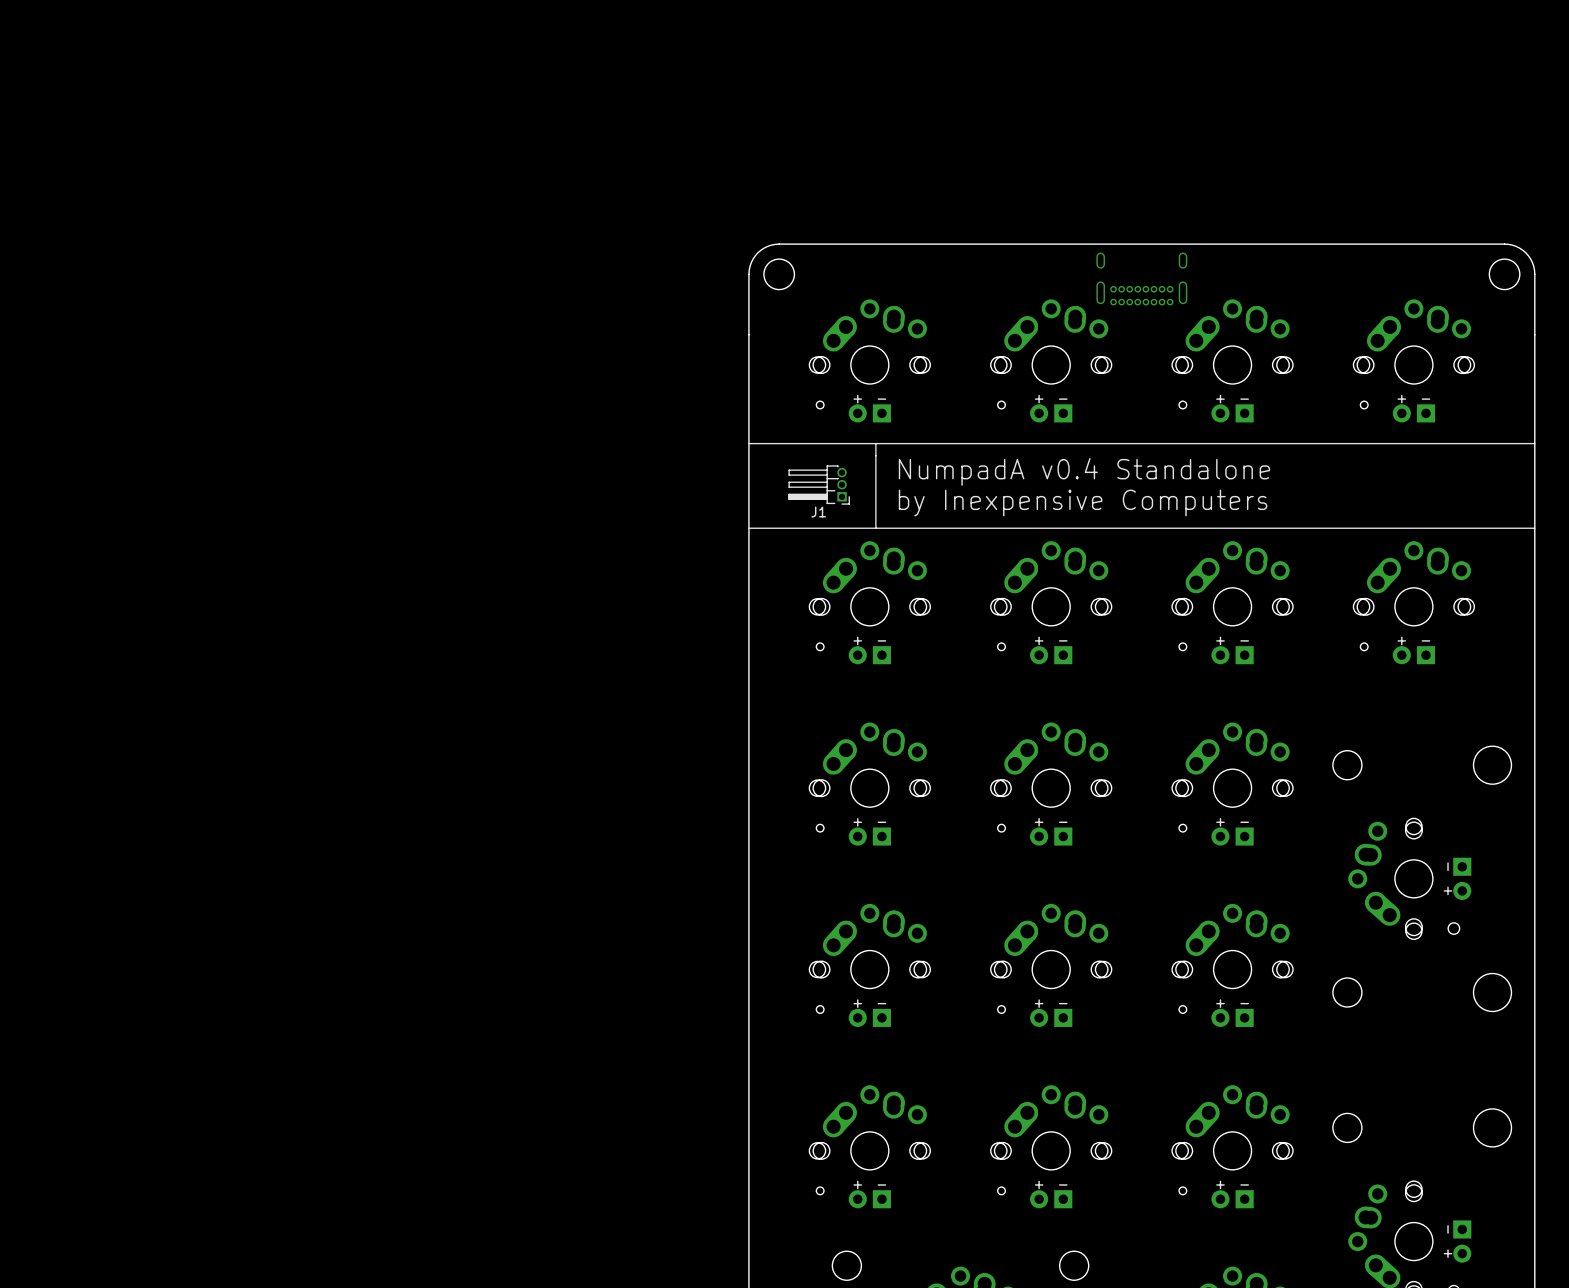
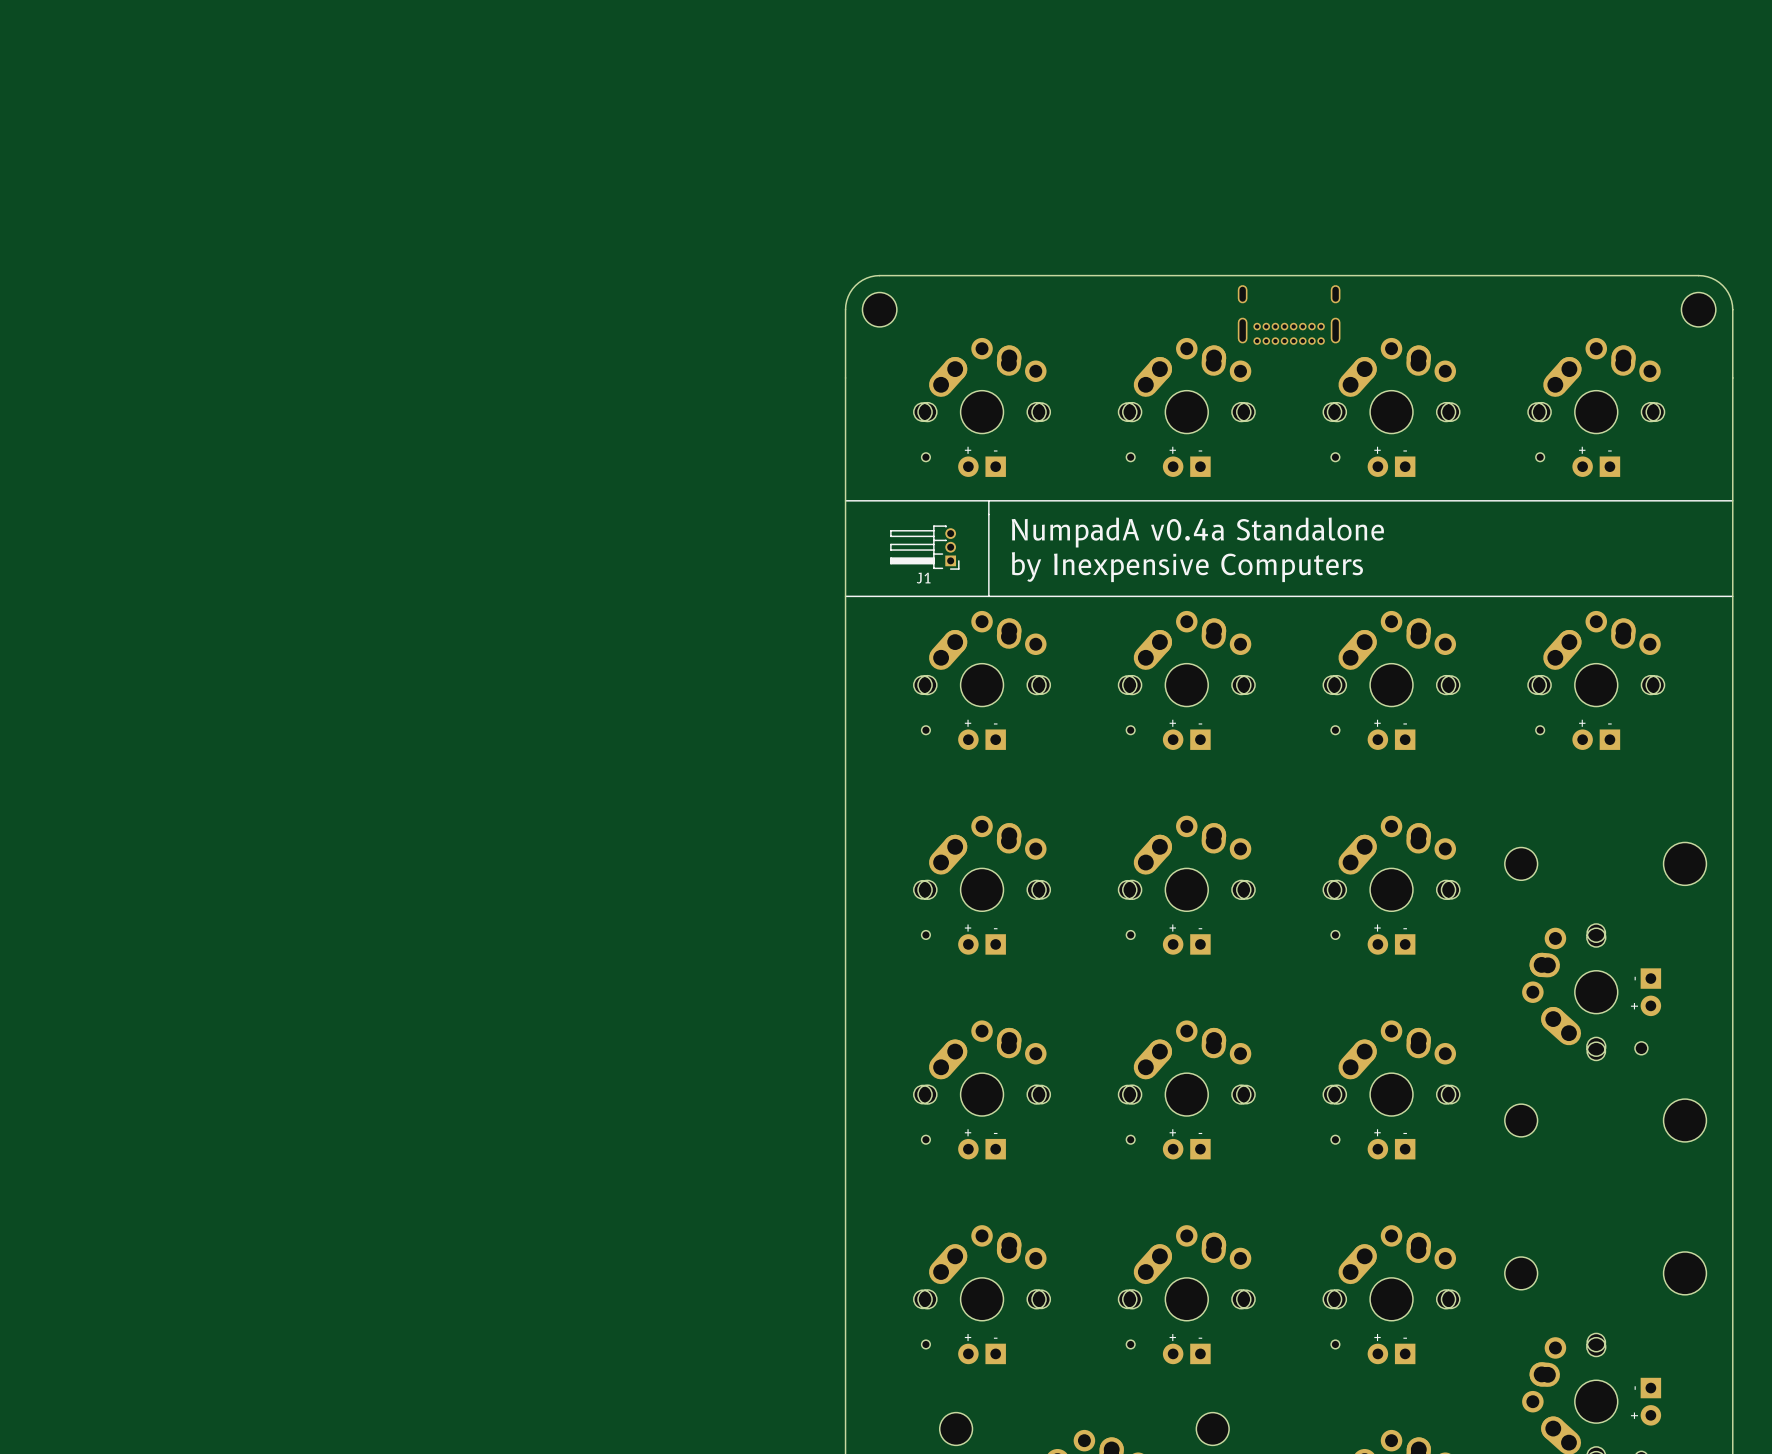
text: NumpadA v0.4 Standalone (1084, 471) -> NumpadA v0.4a Standalone (1197, 532)

